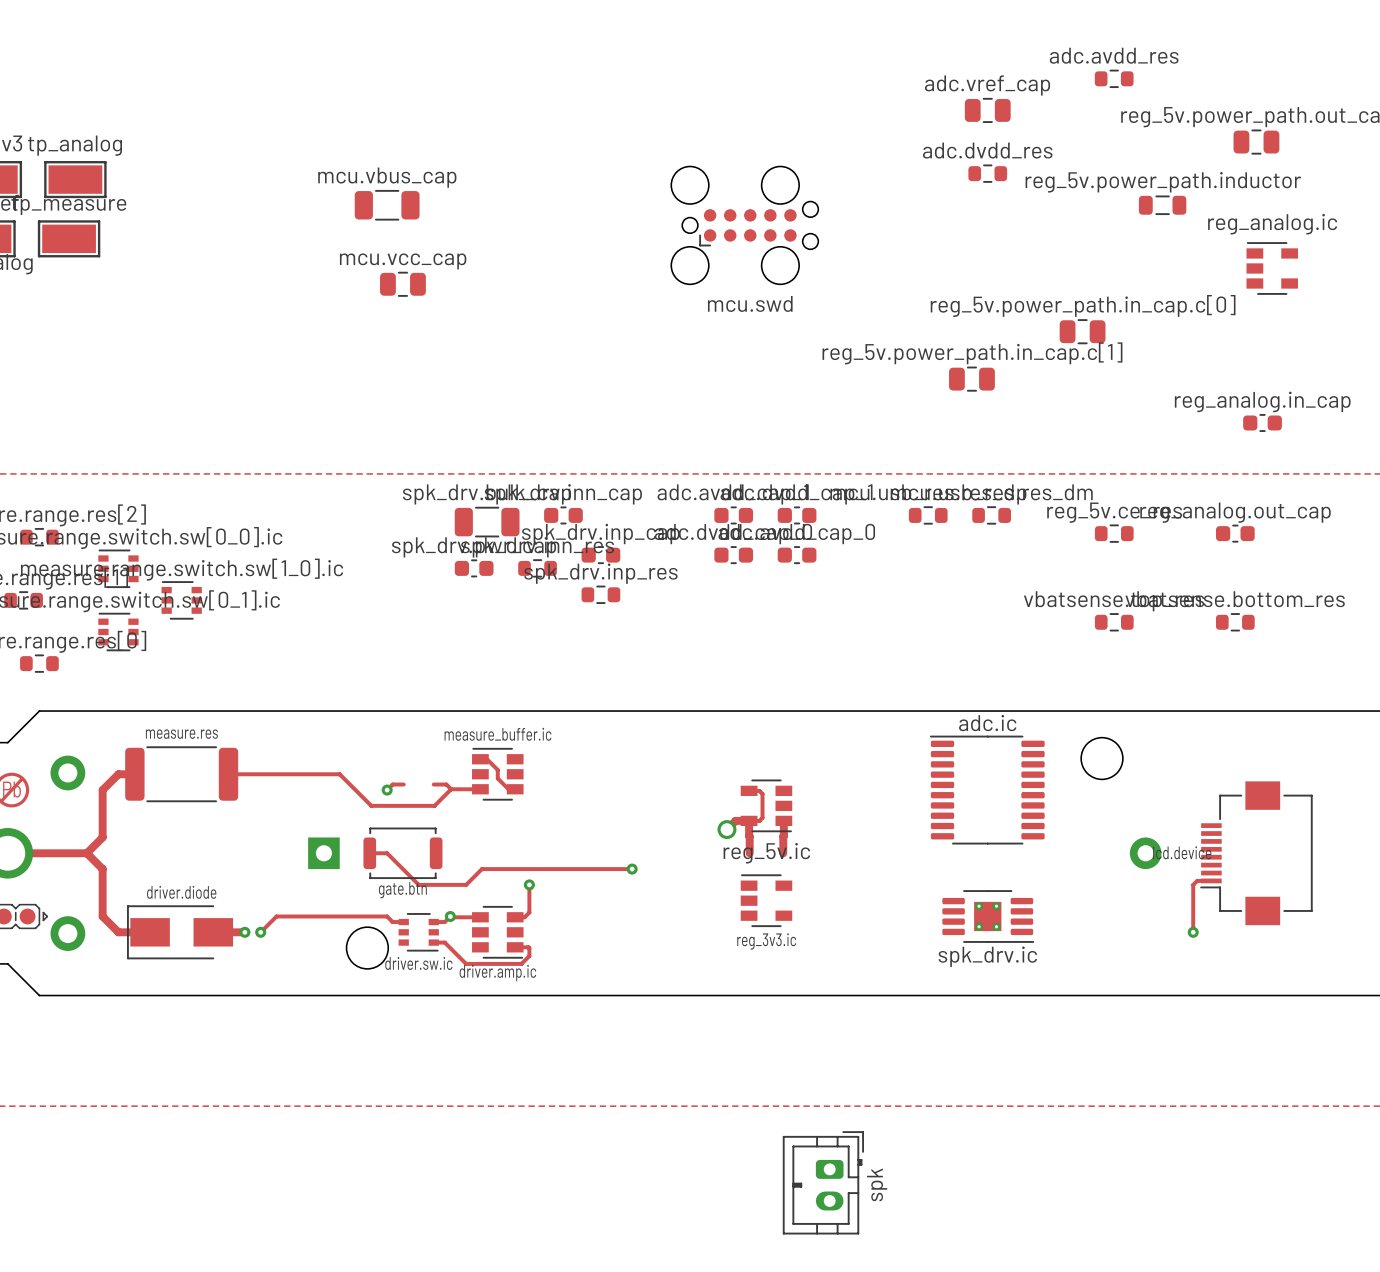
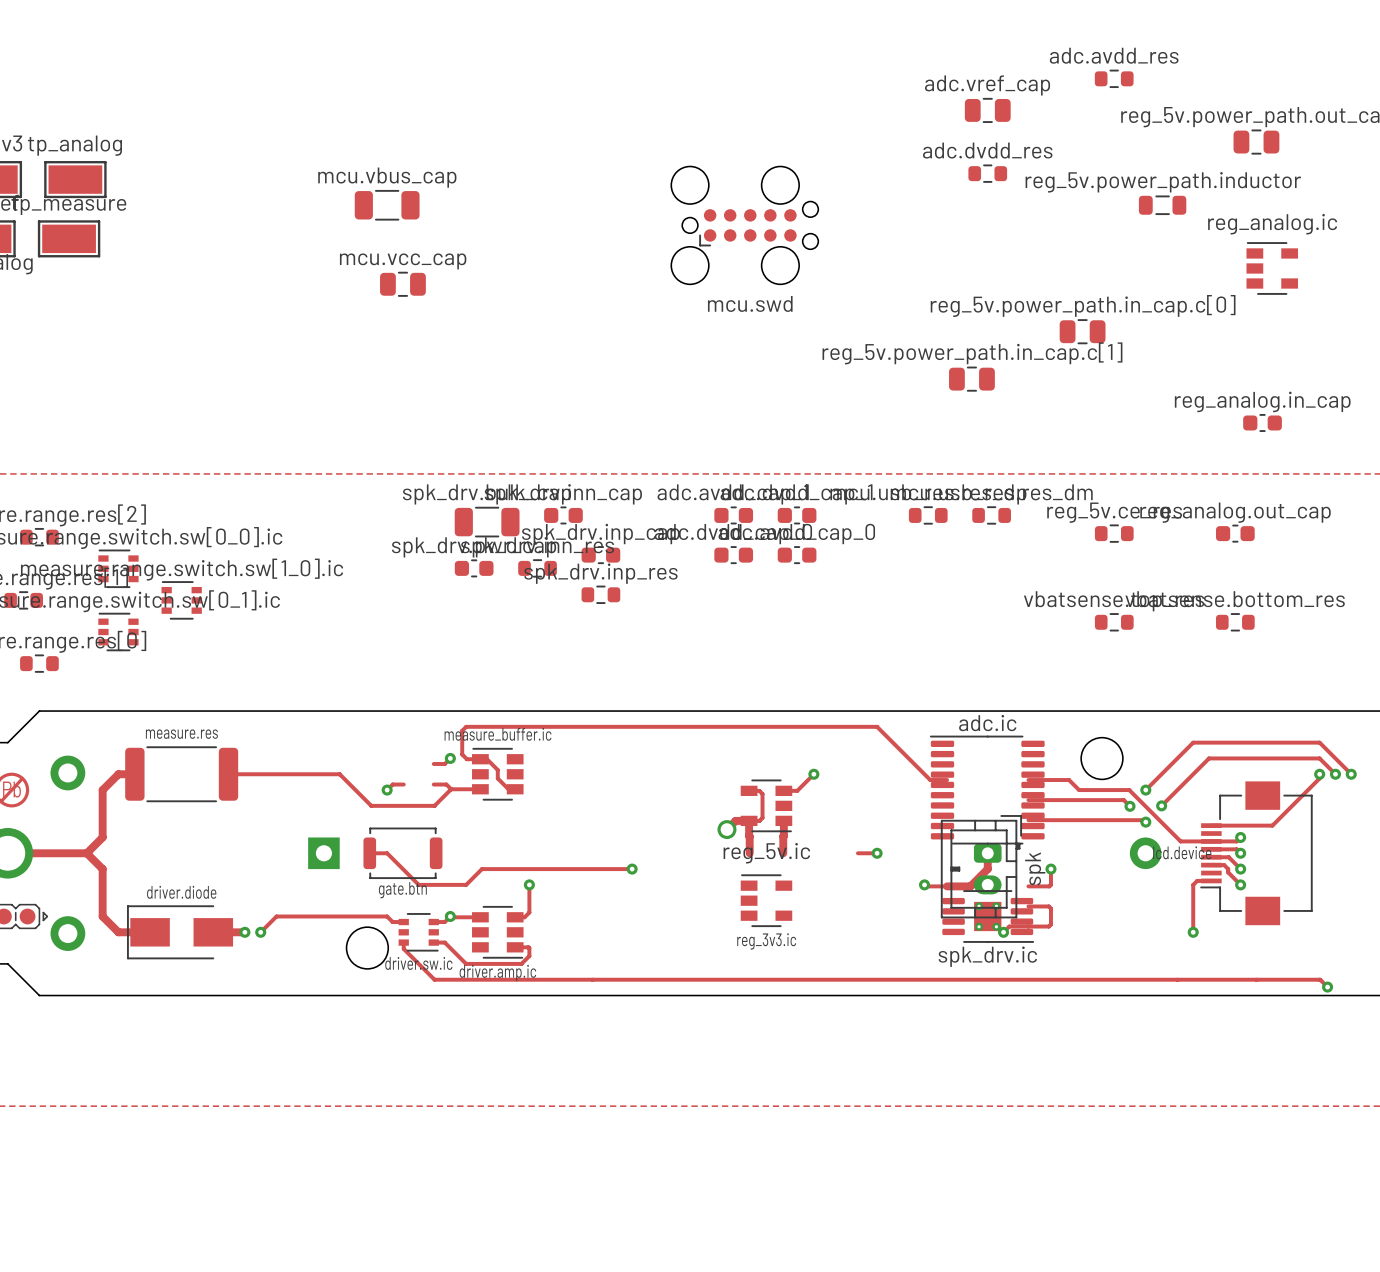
track: none -> (450, 758) (444, 763) (433, 763)
via: none -> (450, 758)
track: none -> (480, 759) (466, 759) (462, 754) (462, 730) (466, 726) (877, 726) (930, 780) (947, 780)
track: none -> (813, 774) (797, 790) (783, 790)
via: none -> (813, 774)
track: none -> (1319, 774) (1319, 778) (1272, 825) (1211, 825)
via: none -> (1319, 774)
track: none -> (1335, 774) (1319, 758) (1209, 758) (1161, 805)
via: none -> (1335, 774)
track: none -> (1351, 774) (1319, 742) (1193, 742) (1145, 790)
via: none -> (1351, 774)
track: none -> (1028, 780) (1069, 780) (1079, 790) (1129, 790) (1180, 841) (1236, 841) (1240, 837)
via: none -> (1145, 790)
track: none -> (1028, 800) (1123, 800) (1130, 806)
via: none -> (1161, 805)
via: none -> (1130, 806)
track: none -> (1028, 820) (1143, 820) (1145, 822)
via: none -> (1145, 822)
via: none -> (1240, 837)
track: none -> (1211, 849) (1236, 849) (1240, 853)
track: none -> (857, 853) (877, 853)
via: none -> (877, 853)
track: none -> (987, 853) (987, 869) (970, 886) (924, 884)
via: none -> (1240, 853)
track: none -> (1211, 857) (1228, 857) (1240, 869)
track: none -> (1211, 865) (1224, 865) (1228, 869) (1228, 872) (1240, 884)
track: none -> (1050, 869) (1049, 886) (1028, 886)
via: none -> (1050, 869)
via: none -> (1240, 869)
via: none -> (924, 884)
via: none -> (1240, 884)
track: none -> (1028, 906) (1048, 906) (1050, 908) (1050, 924) (1048, 926) (1009, 926) (1003, 932)
via: none -> (1003, 932)
track: none -> (403, 942) (403, 948) (434, 979) (1320, 979) (1327, 987)
via: none -> (1327, 987)
spk position: (823, 1182) -> (981, 866)

